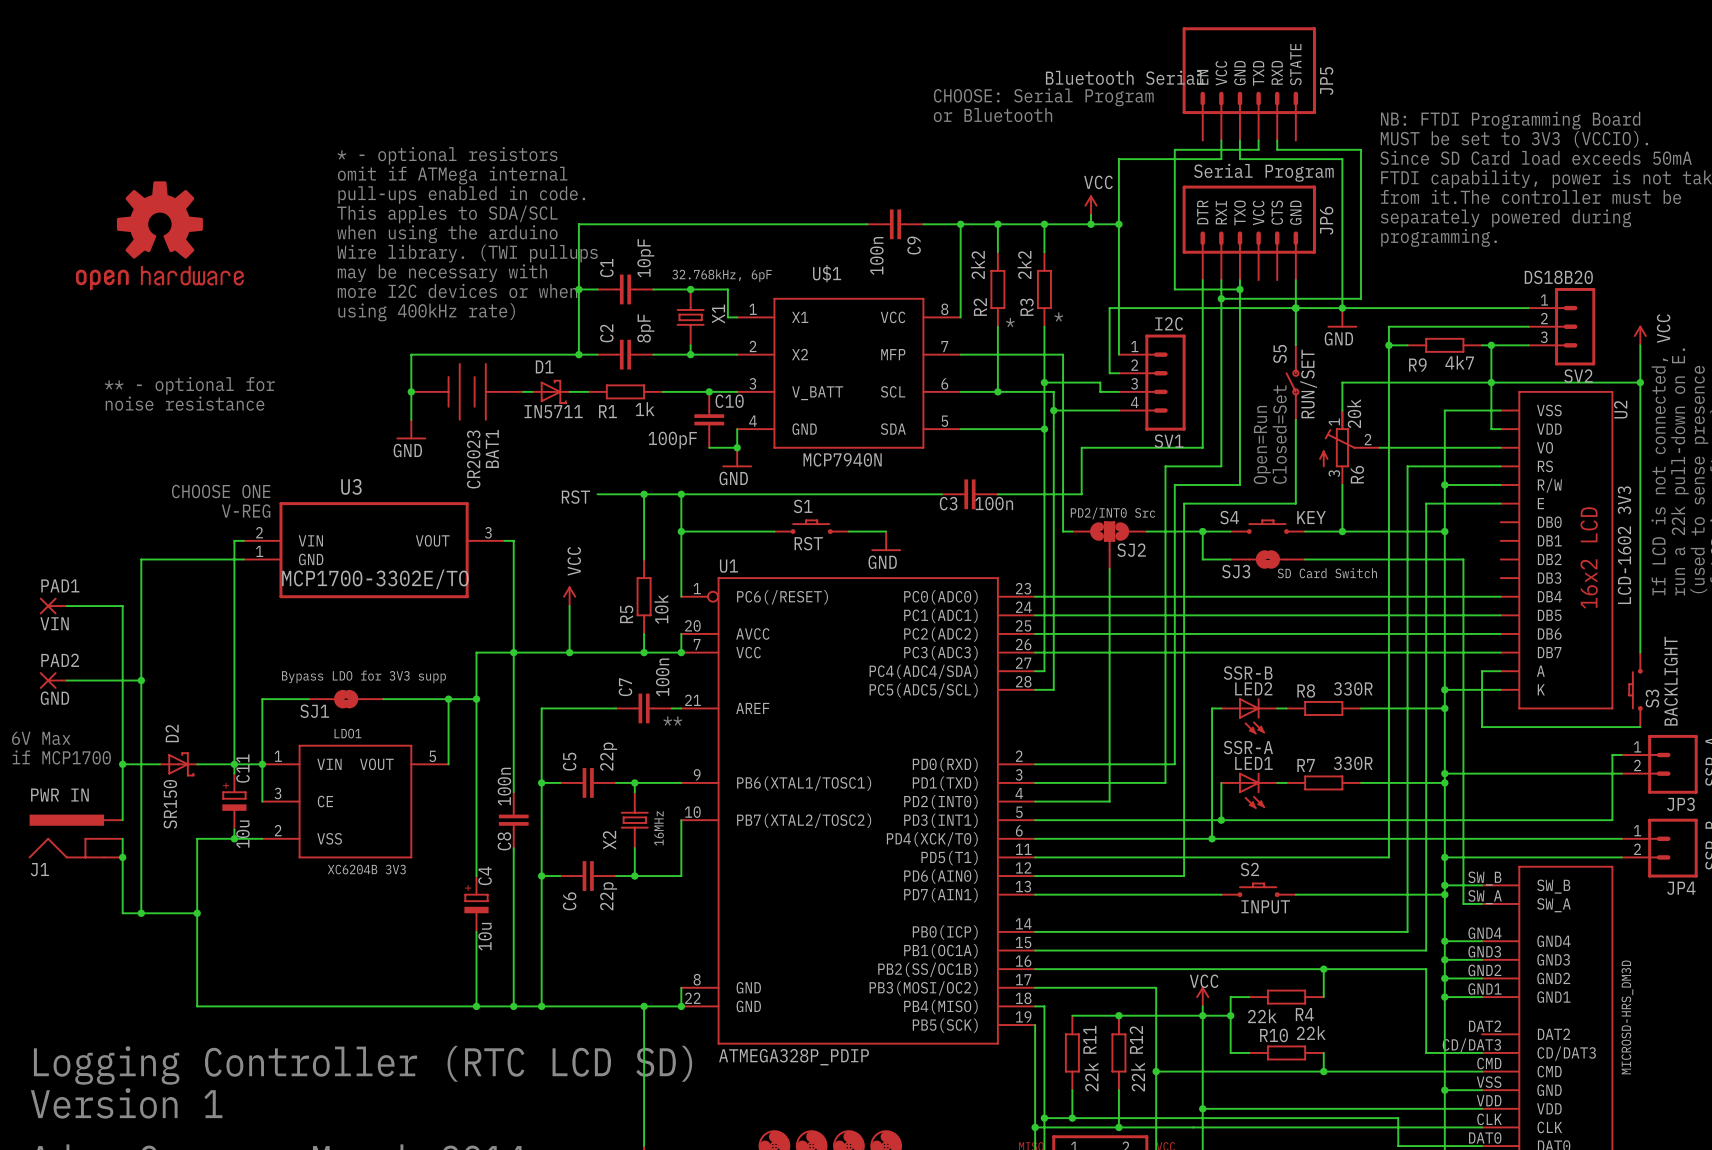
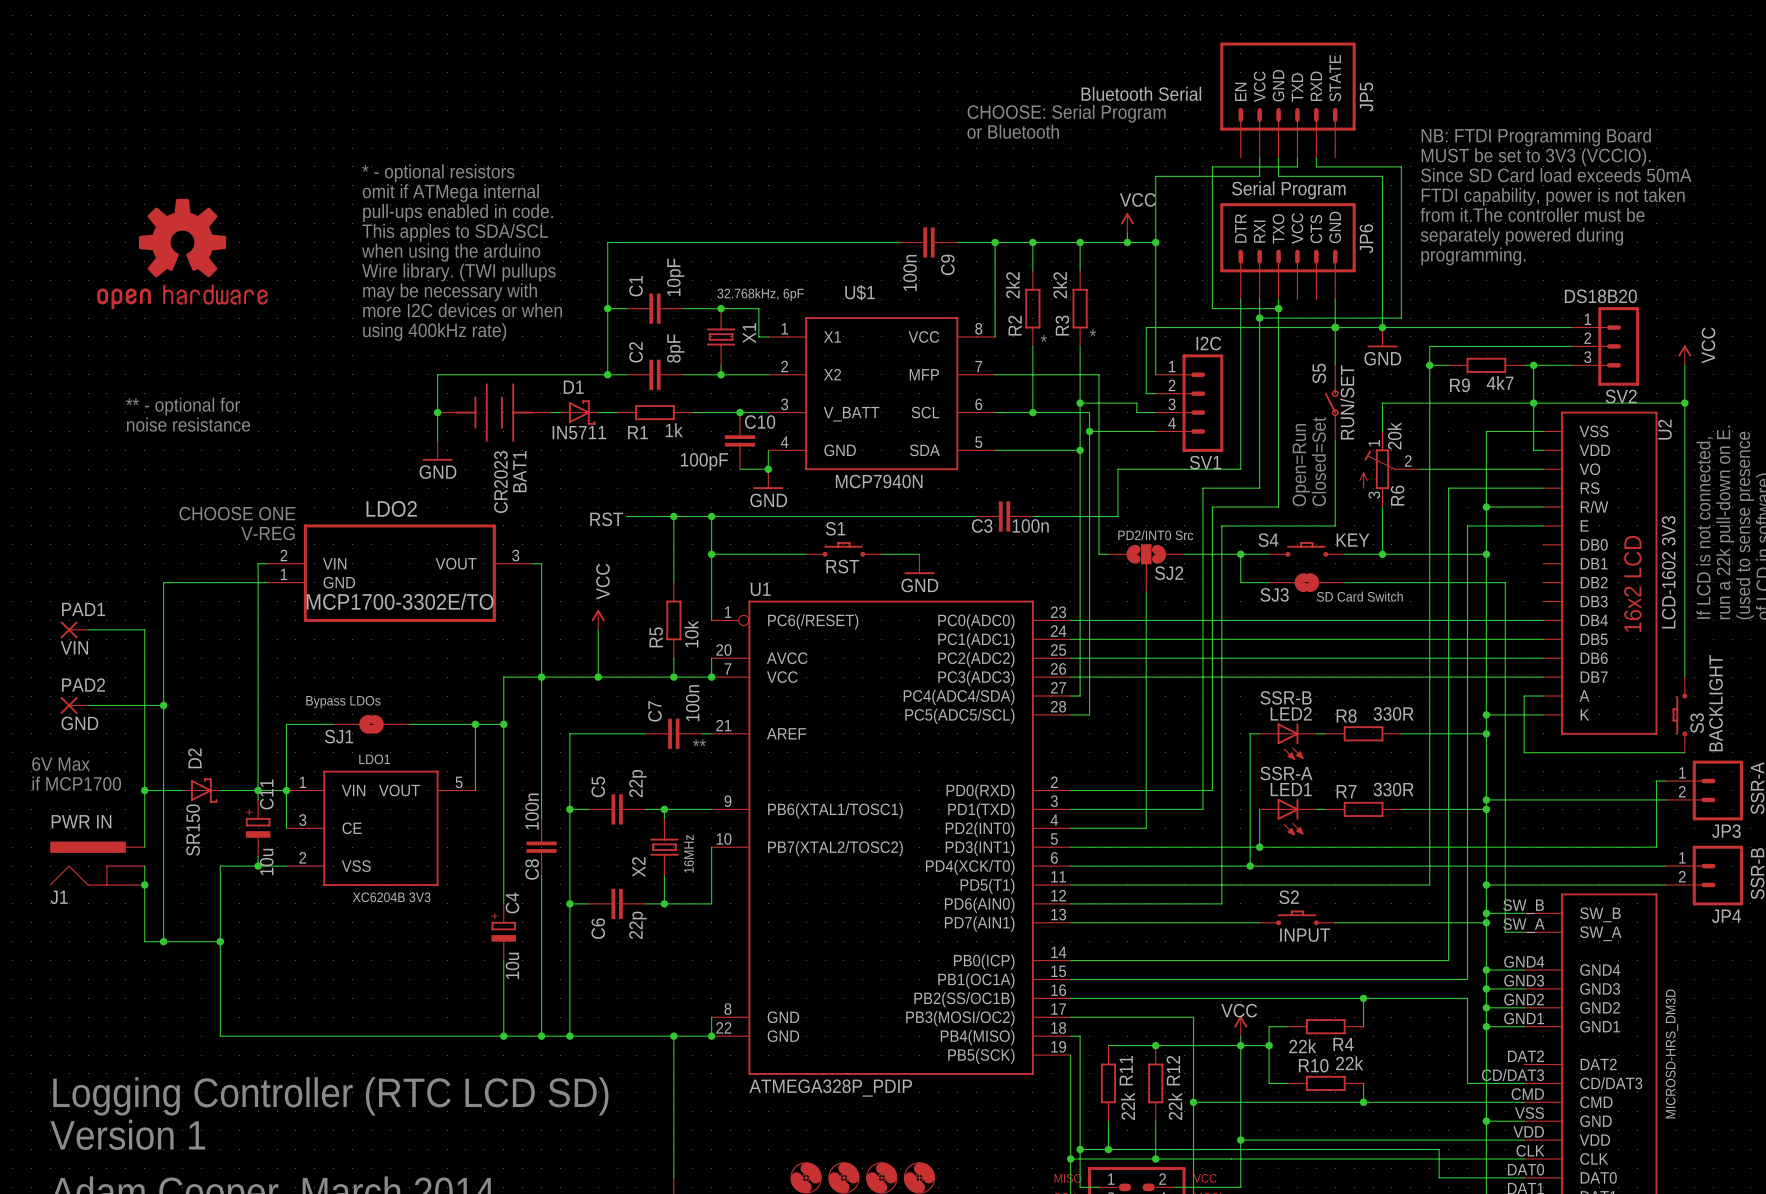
U3 name: U3 (351, 486) -> LDO2 (391, 508)
SJ1 value: Bypass LDO for 3V3 supp (363, 676) -> Bypass LDOs (343, 702)

